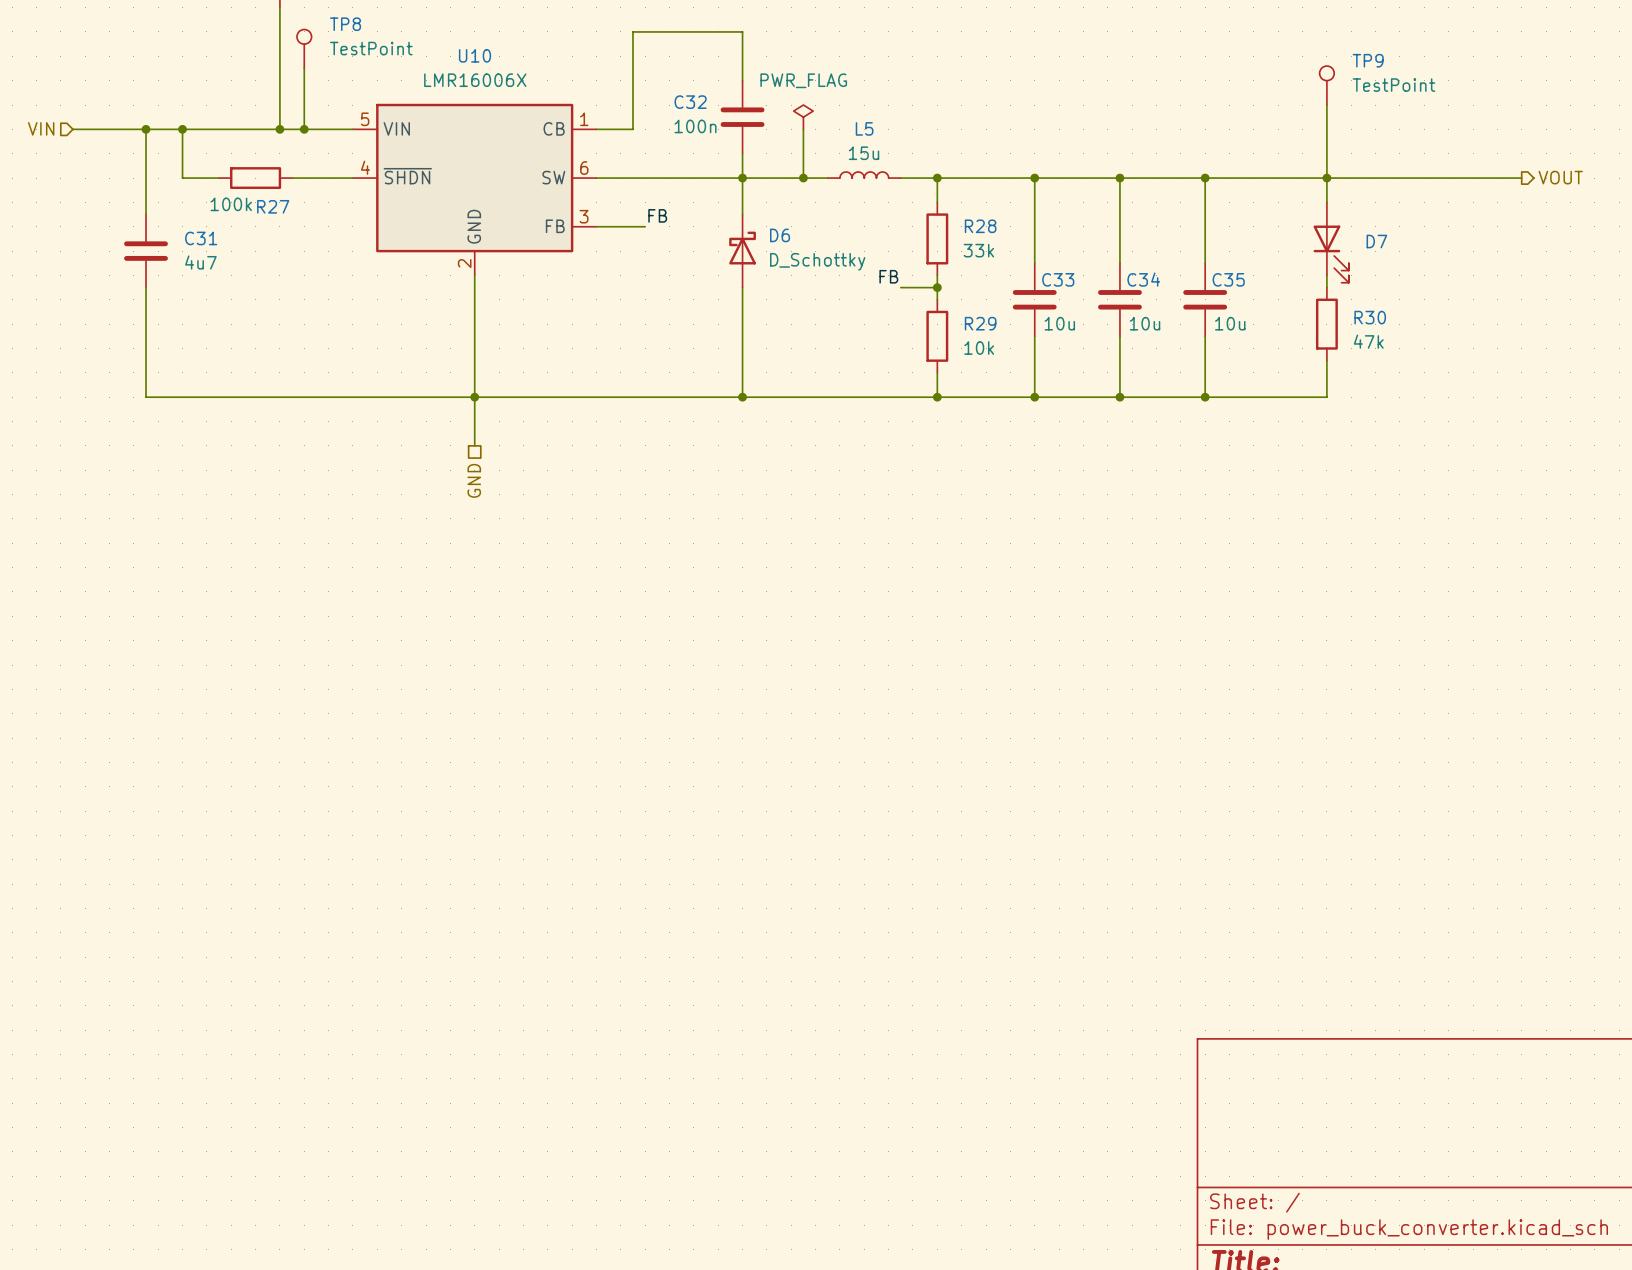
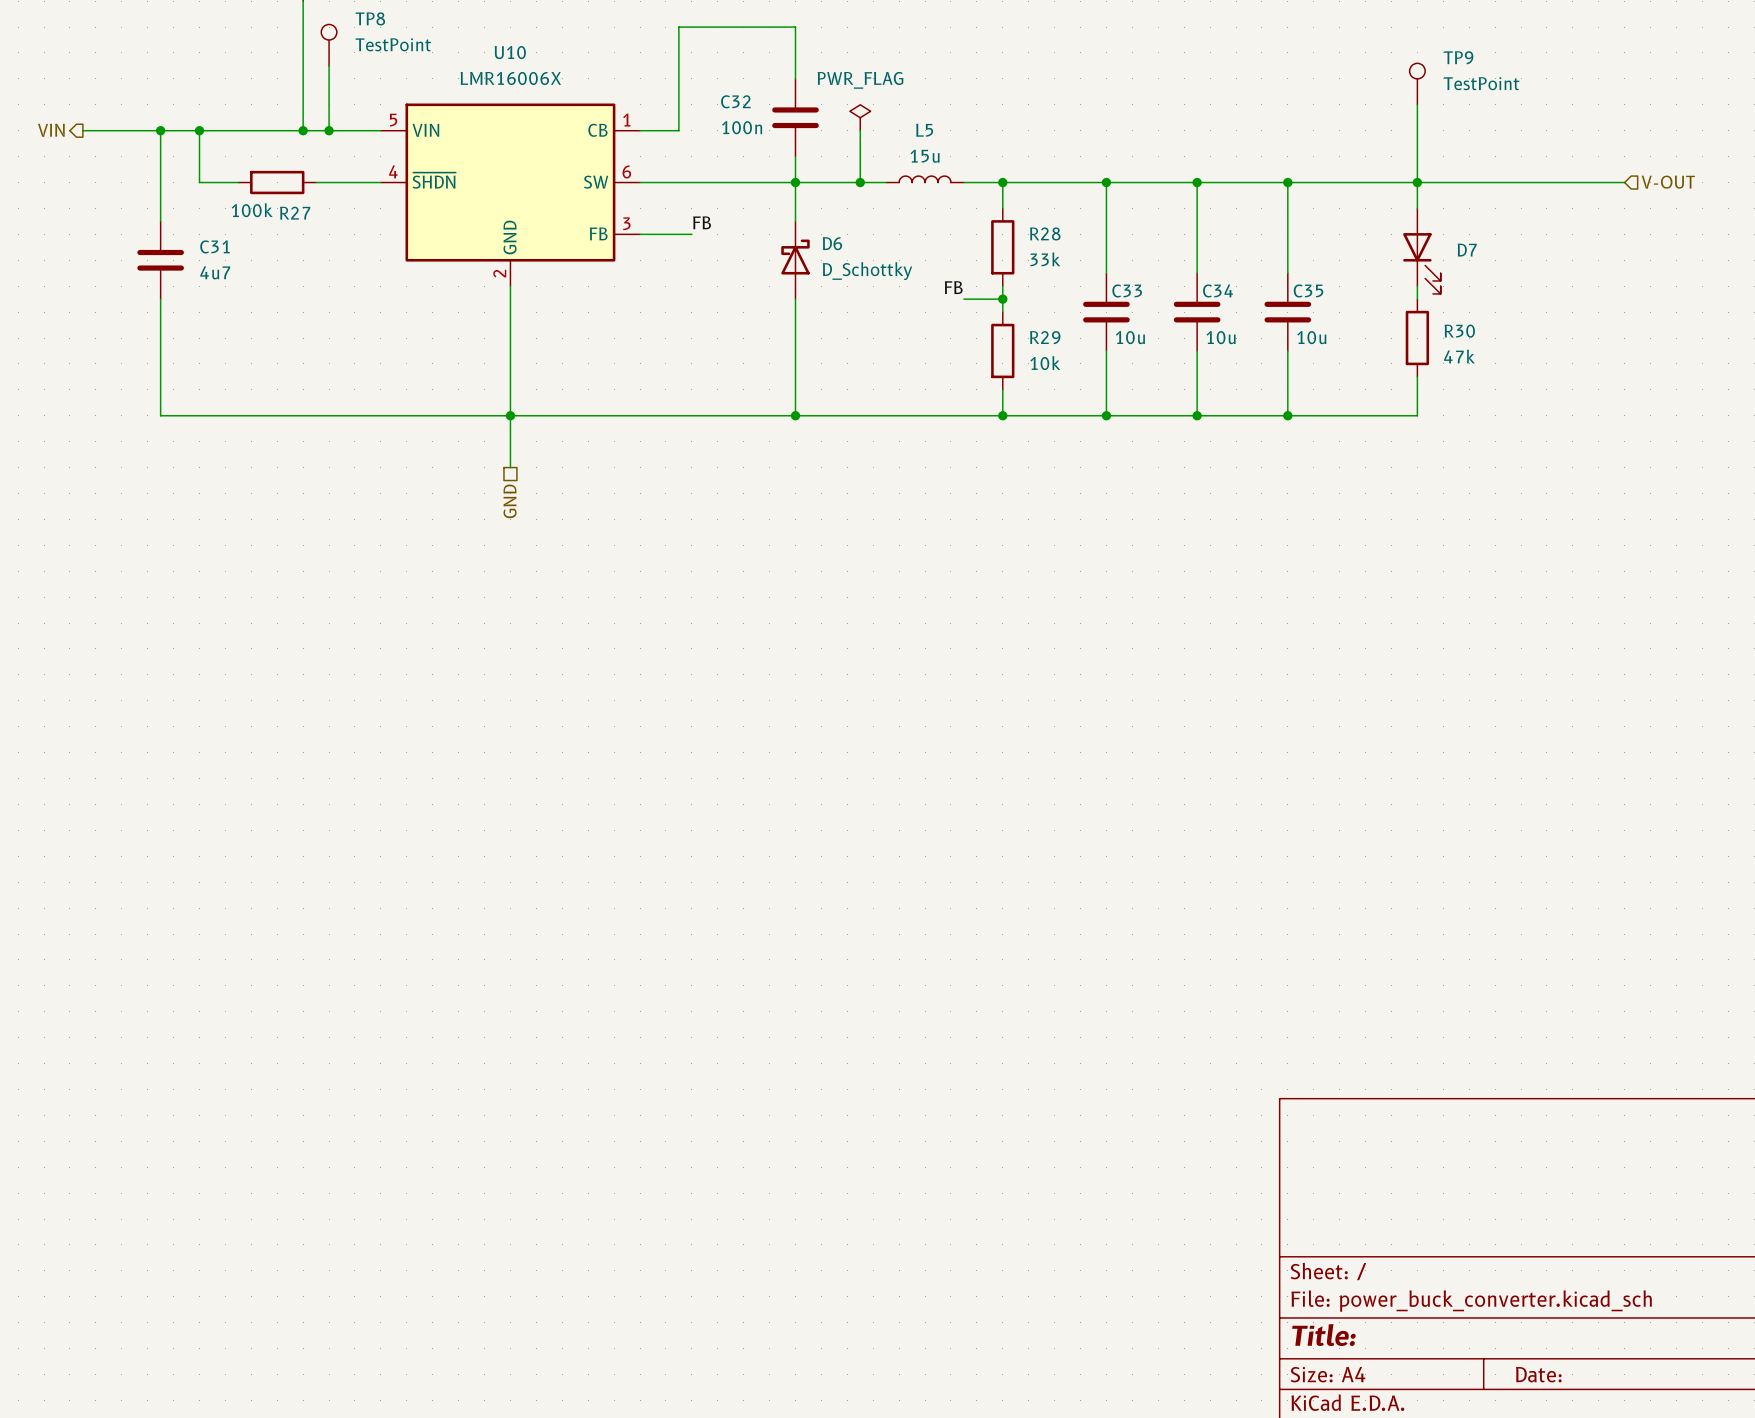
hierarchical label shape: input (41, 128) -> output (51, 130)
hierarchical label shape: output (1560, 177) -> input (1668, 182)
hierarchical label: VOUT (1560, 177) -> V-OUT (1668, 182)

